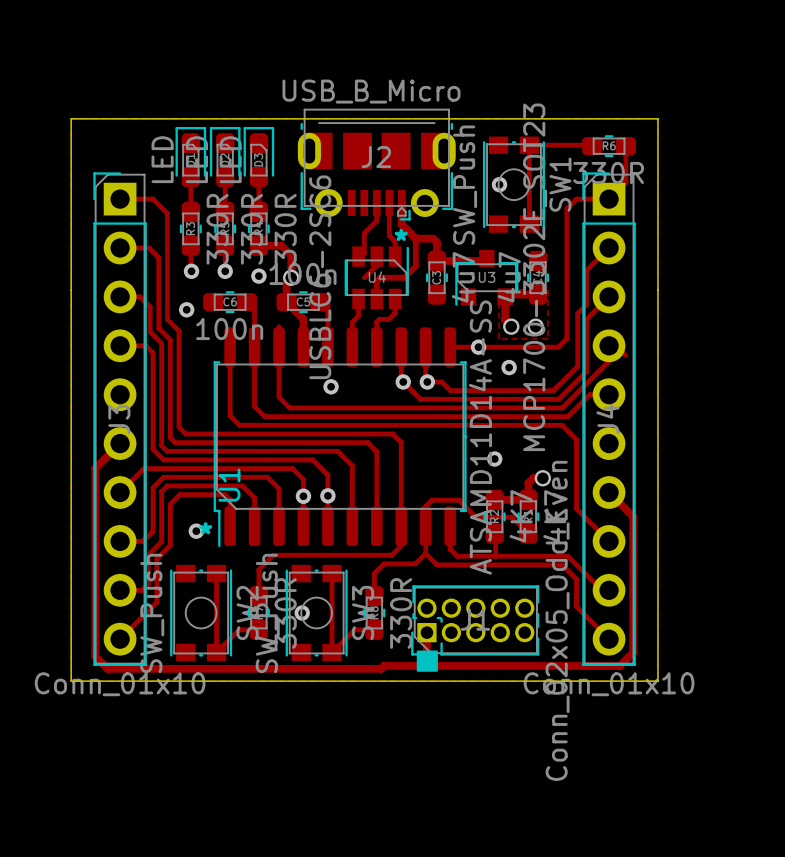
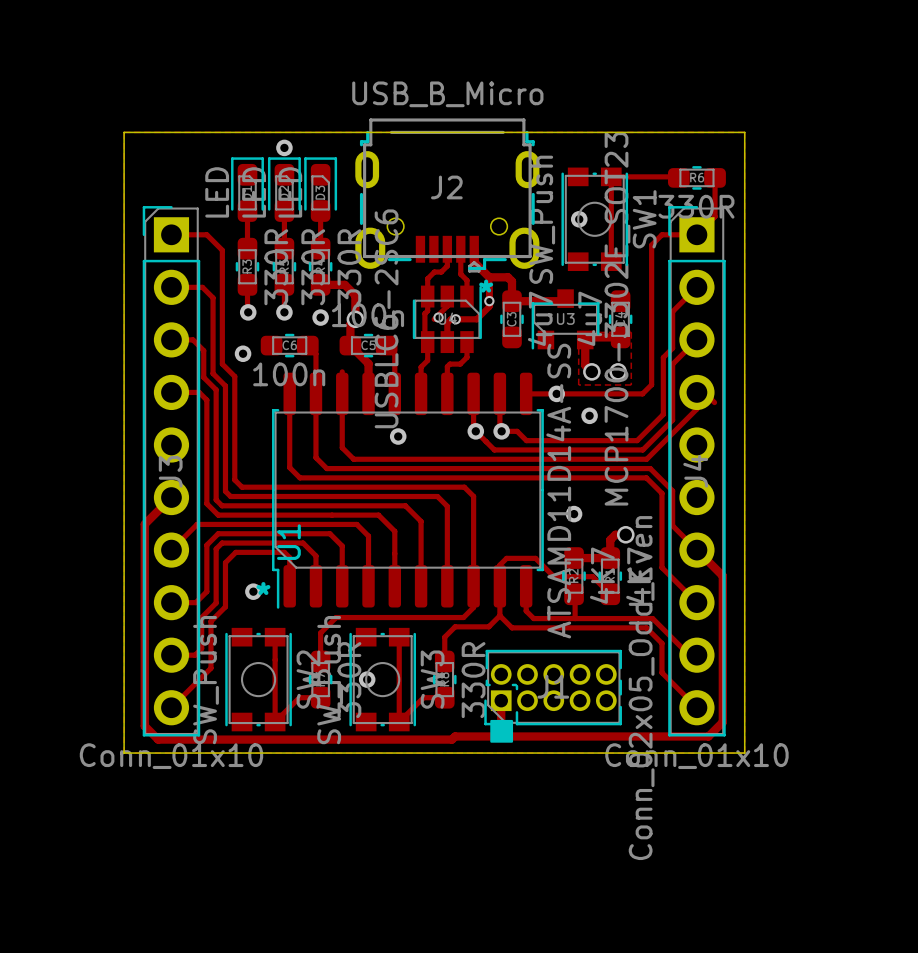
J2 footprint: [297, 108, 456, 221] -> [355, 118, 540, 273]
board edge: (71, 118) (71, 681) (657, 681) (657, 118) (71, 118) -> (124, 132) (124, 753) (744, 753) (744, 132) (124, 132)
via: none -> (284, 147)
track: (376, 220) (364, 233) (364, 253) (361, 256) -> (447, 258) (447, 266) (441, 272) (434, 272) (427, 278) (427, 310) (424, 313) (424, 339) (427, 342)
text position: * (401, 234) -> * (486, 286)
via: none -> (489, 301)
via: none -> (438, 317)
via: none -> (455, 319)
track: (609, 394) (589, 394) (565, 416) -> (696, 550) (672, 525) (672, 490) (650, 468)
via: (327, 495) -> none
via: (303, 496) -> none

